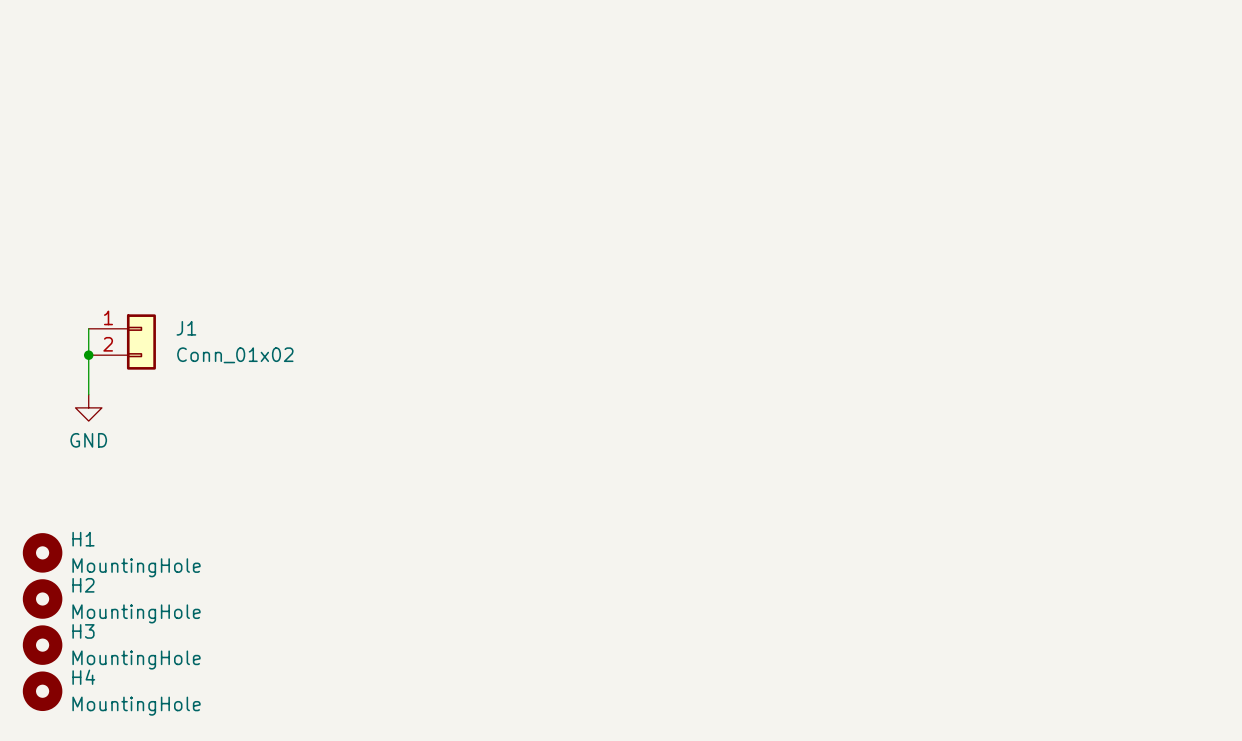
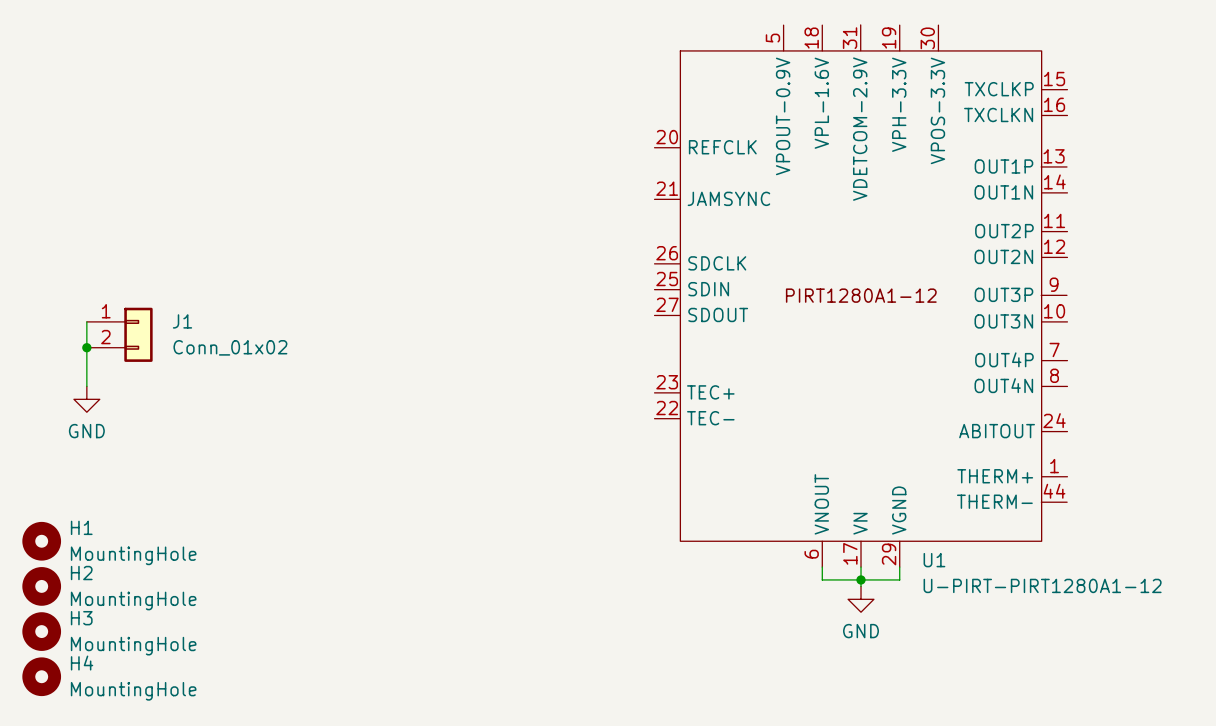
U1: none -> U-PIRT-PIRT1280A1-12 (861, 295)
wire: none -> (822, 567) (822, 579) (899, 579) (899, 567)
wire: none -> (861, 567) (861, 586)
junction: none -> (861, 579)
power symbol: none -> GND (861, 599)

